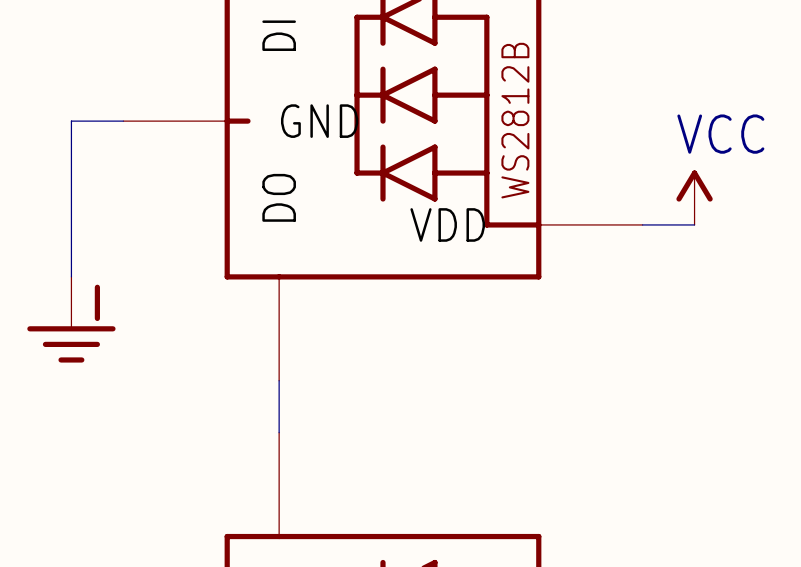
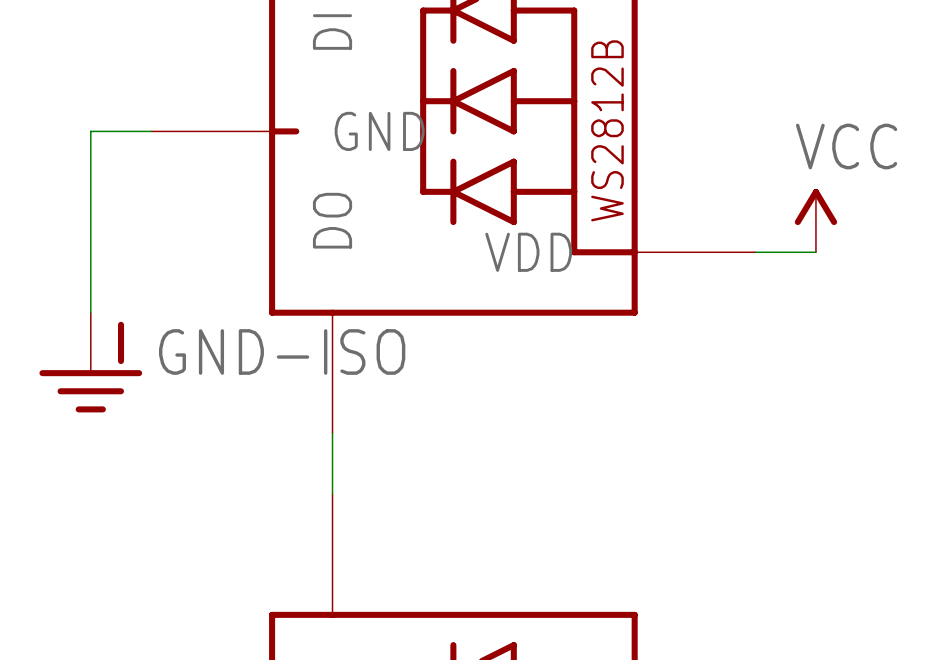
power symbol text: none -> GND-ISO (282, 351)

